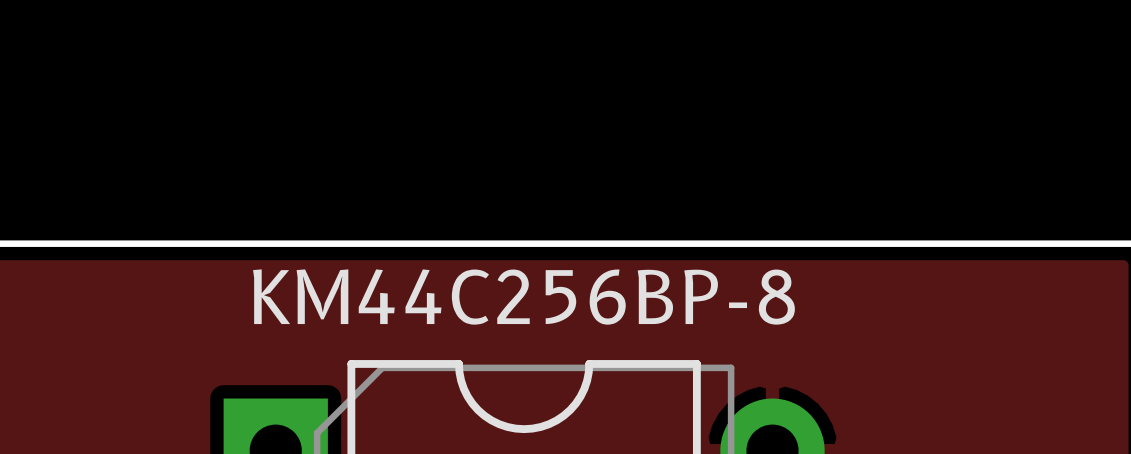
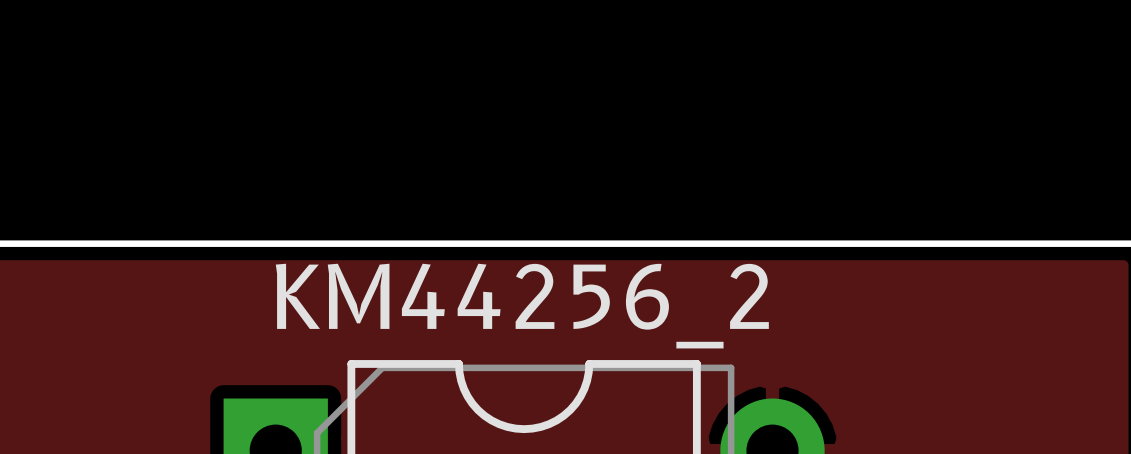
KM44C256BP-8 name: KM44C256BP-8 (523, 297) -> KM44256_2 (522, 306)

